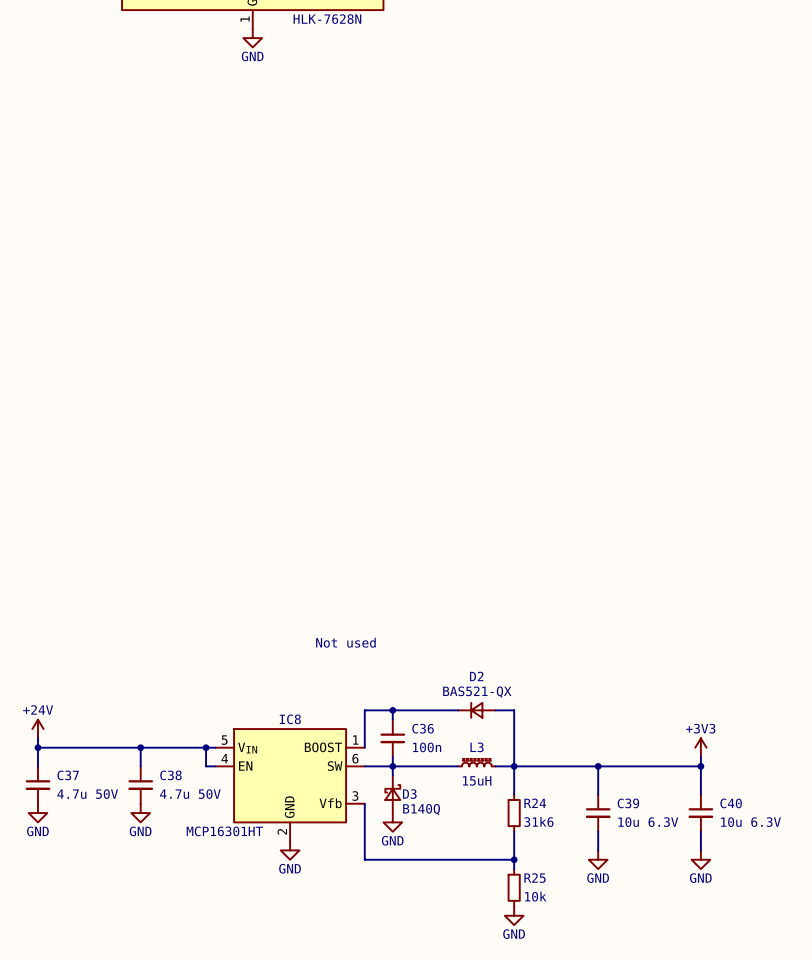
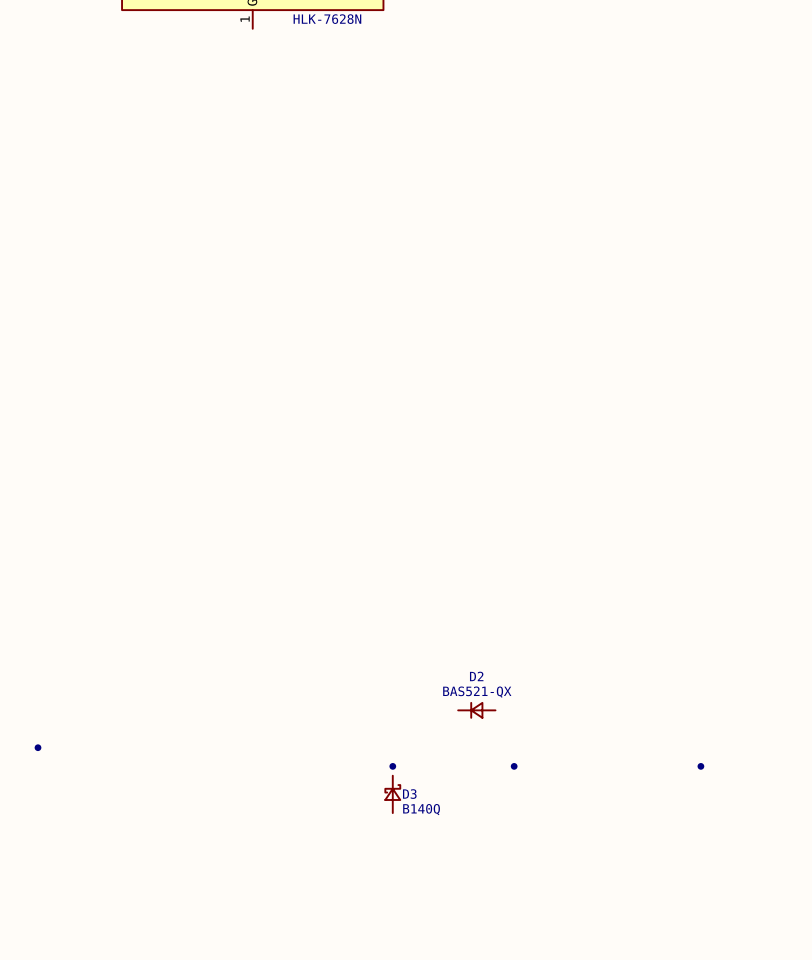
power symbol: GND (252, 38) -> none
text: Not used (345, 642) -> none
wire: (392, 710) (392, 719) -> none
junction: (392, 710) -> none
wire: (458, 710) (364, 710) (364, 747) -> none
wire: (495, 710) (514, 710) (514, 794) -> none
power symbol: +24V (38, 729) -> none
wire: (38, 738) (38, 766) -> none
C36: 100n (392, 738) -> none
wire: (38, 747) (215, 747) -> none
wire: (140, 747) (140, 766) -> none
junction: (140, 747) -> none
wire: (206, 747) (206, 766) (215, 766) -> none
junction: (206, 747) -> none
power symbol: +3V3 (700, 747) -> none
wire: (392, 757) (392, 775) -> none
wire: (700, 757) (700, 794) -> none
L3: 15uH (476, 762) -> none
wire: (364, 766) (458, 766) -> none
wire: (495, 766) (700, 766) -> none
wire: (598, 766) (598, 794) -> none
junction: (598, 766) -> none
IC8: MCP16301HT (290, 784) -> none
C37: 4.7u 50V (38, 785) -> none
C38: 4.7u 50V (140, 785) -> none
wire: (364, 803) (364, 859) (514, 859) -> none
power symbol: GND (38, 813) -> none
power symbol: GND (140, 813) -> none
R24: 31k6 (514, 813) -> none
C39: 10u 6.3V (598, 813) -> none
C40: 10u 6.3V (700, 813) -> none
power symbol: GND (392, 822) -> none
wire: (514, 831) (514, 869) -> none
wire: (598, 831) (598, 850) -> none
wire: (700, 831) (700, 850) -> none
power symbol: GND (290, 850) -> none
junction: (514, 859) -> none
power symbol: GND (598, 859) -> none
power symbol: GND (700, 859) -> none
R25: 10k (514, 887) -> none
power symbol: GND (514, 915) -> none

